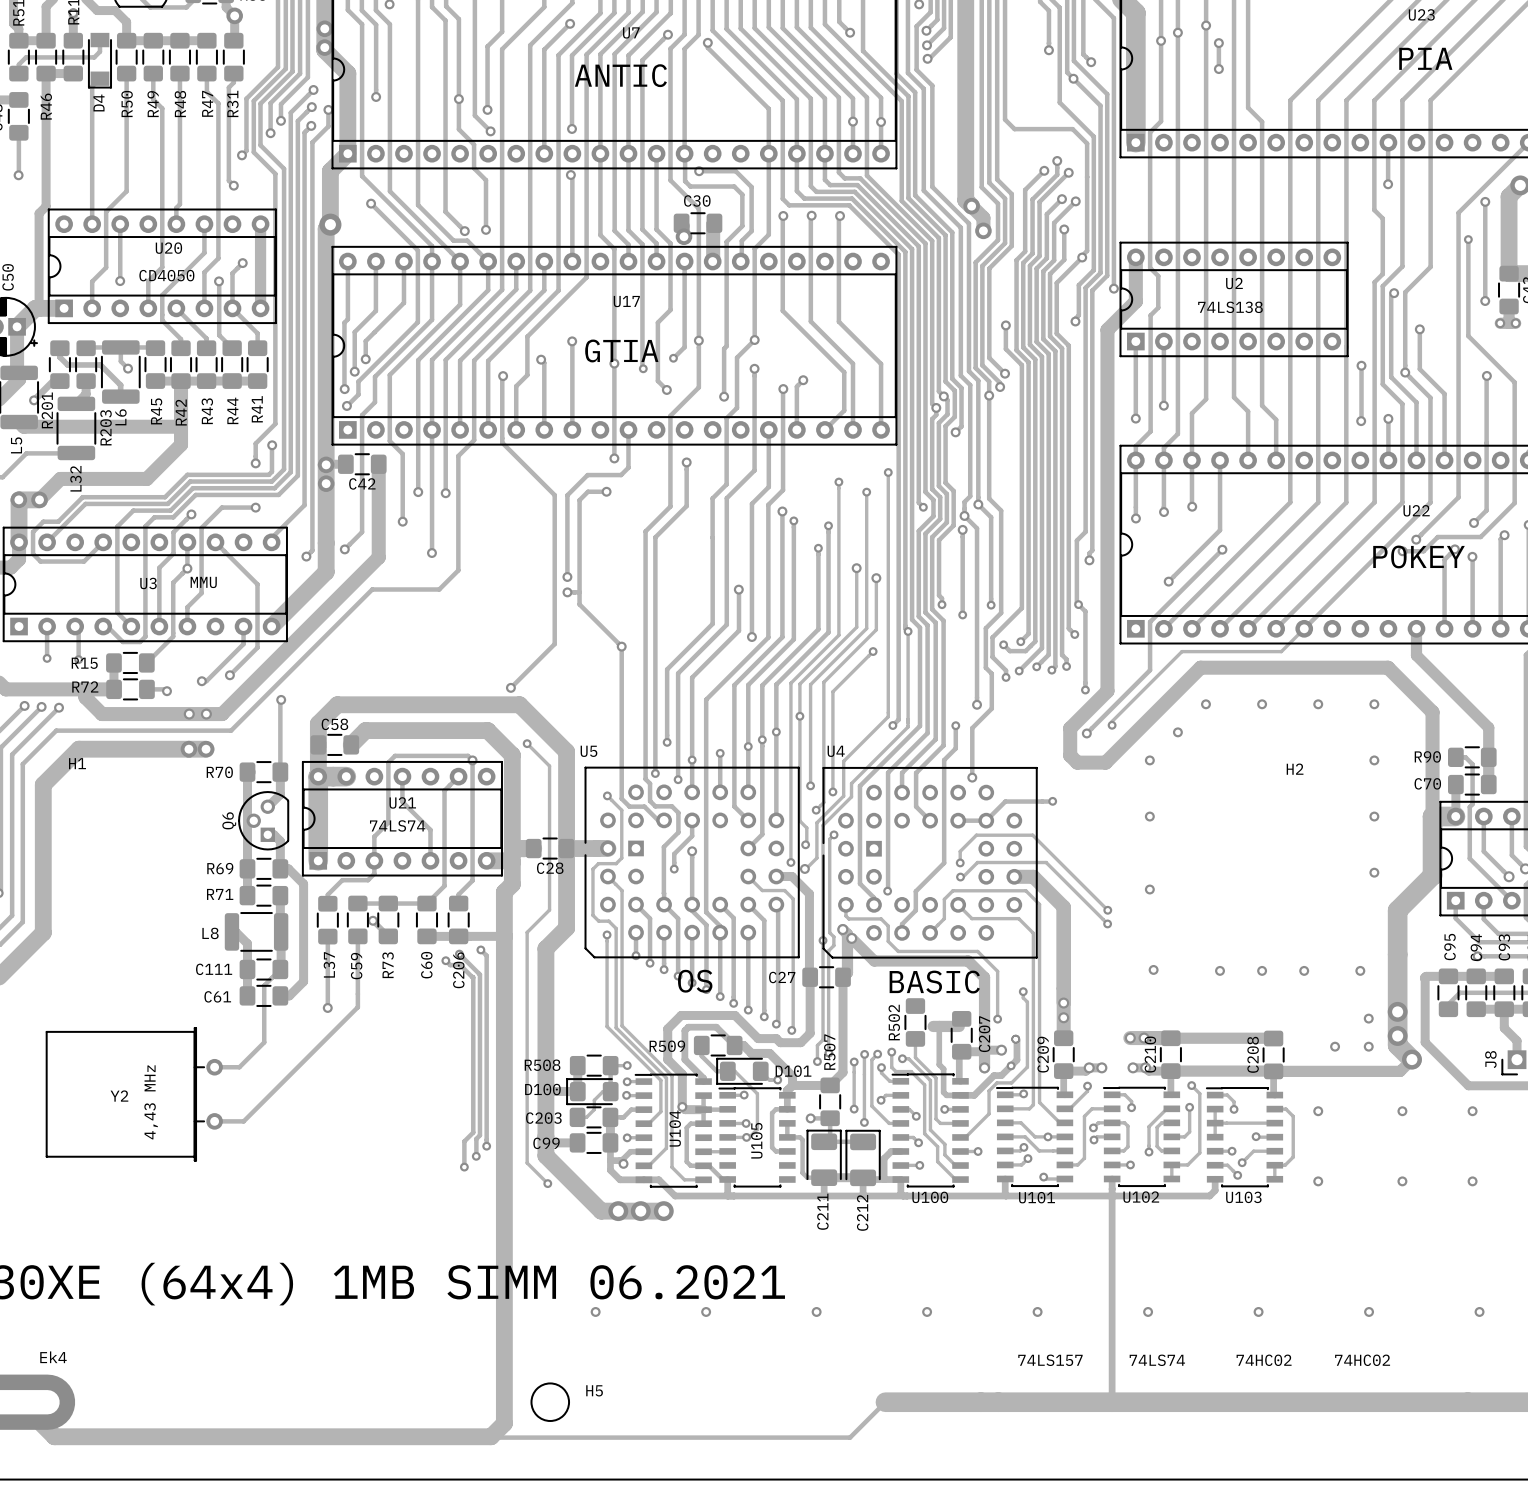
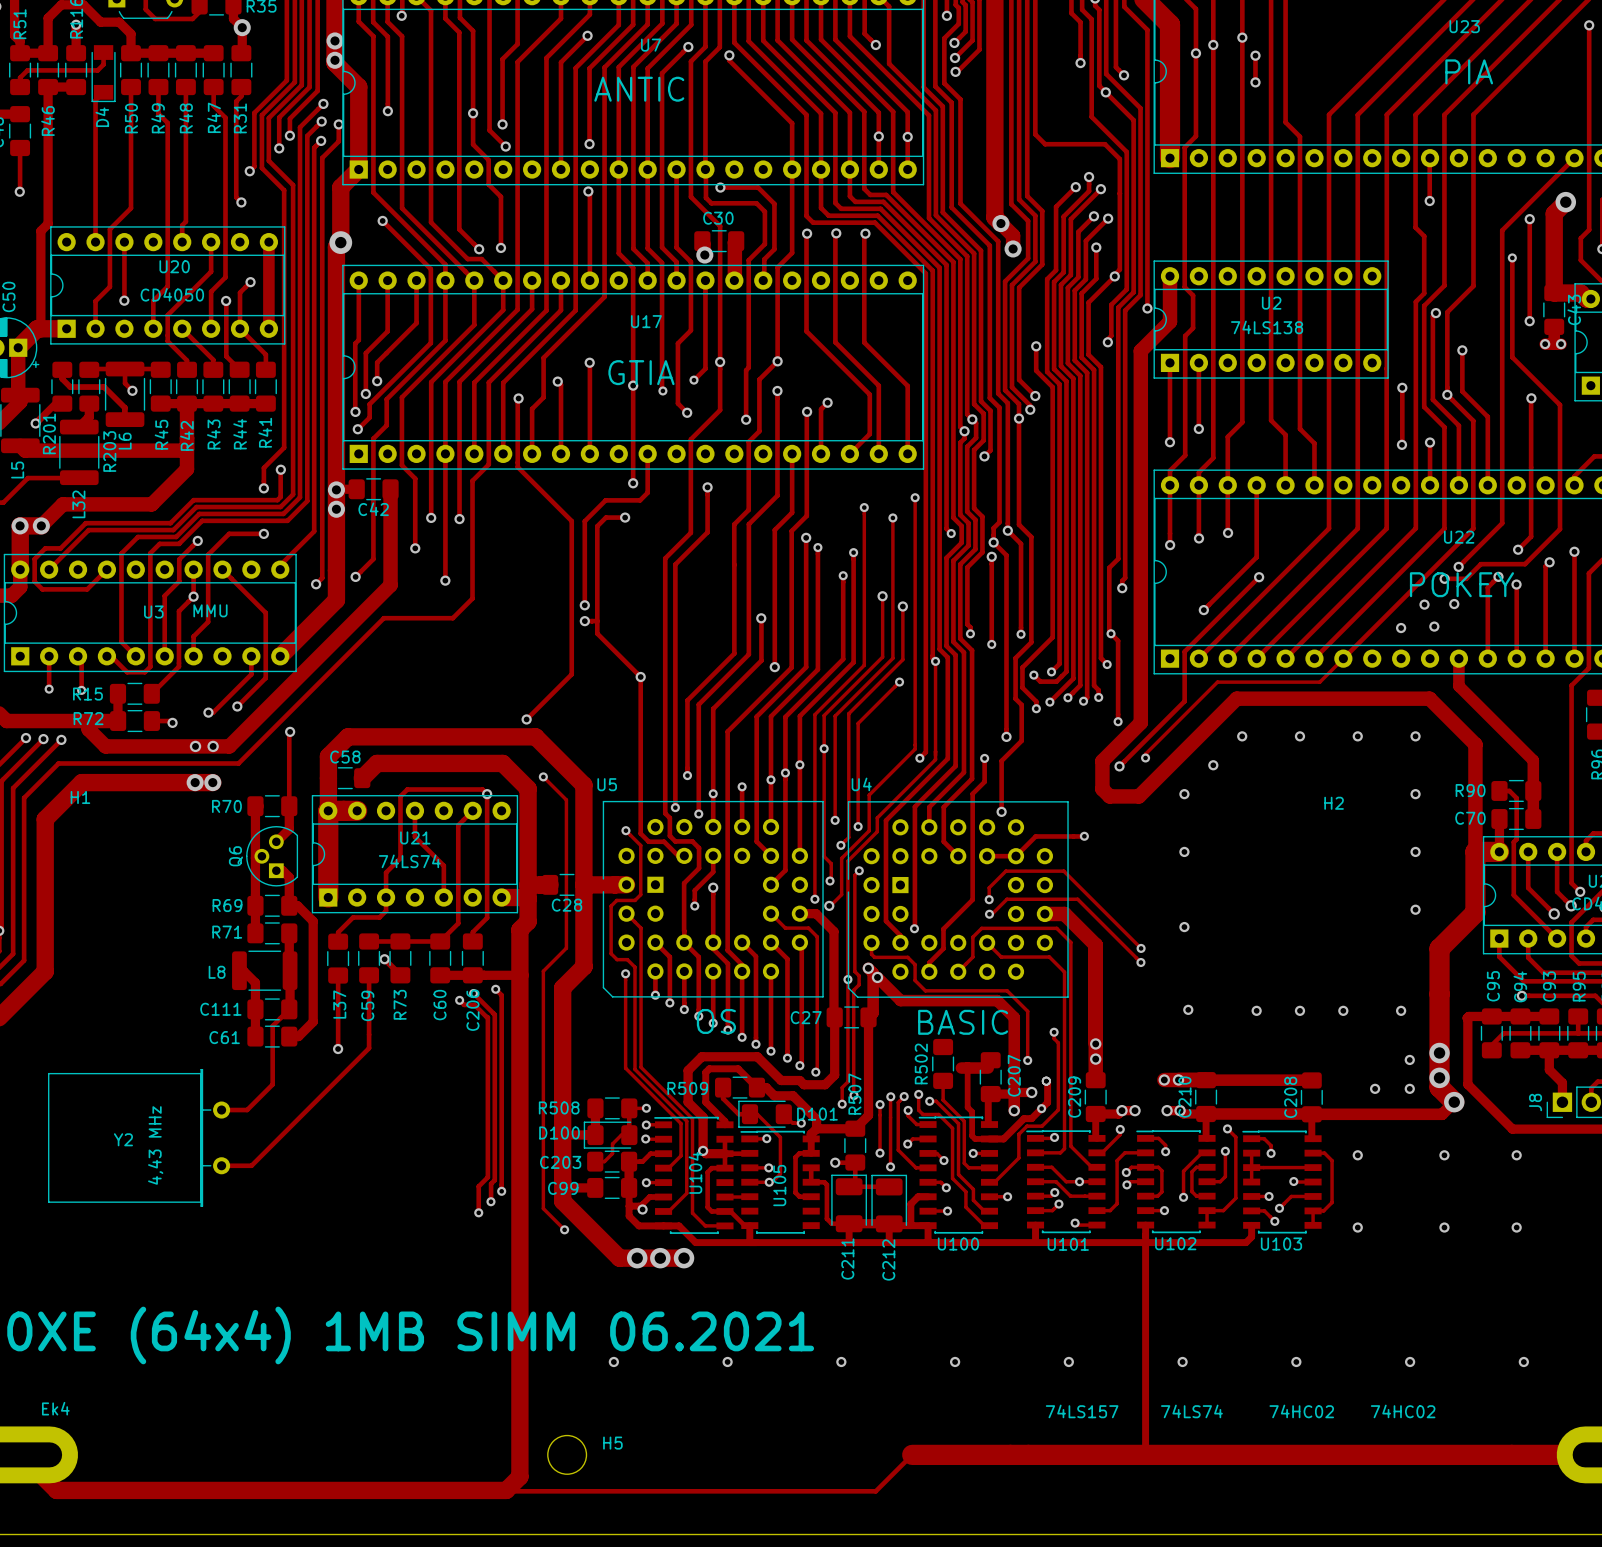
via: none -> (1454, 604)
via: none -> (1424, 604)
via: none -> (1434, 626)
via: none -> (1401, 628)

